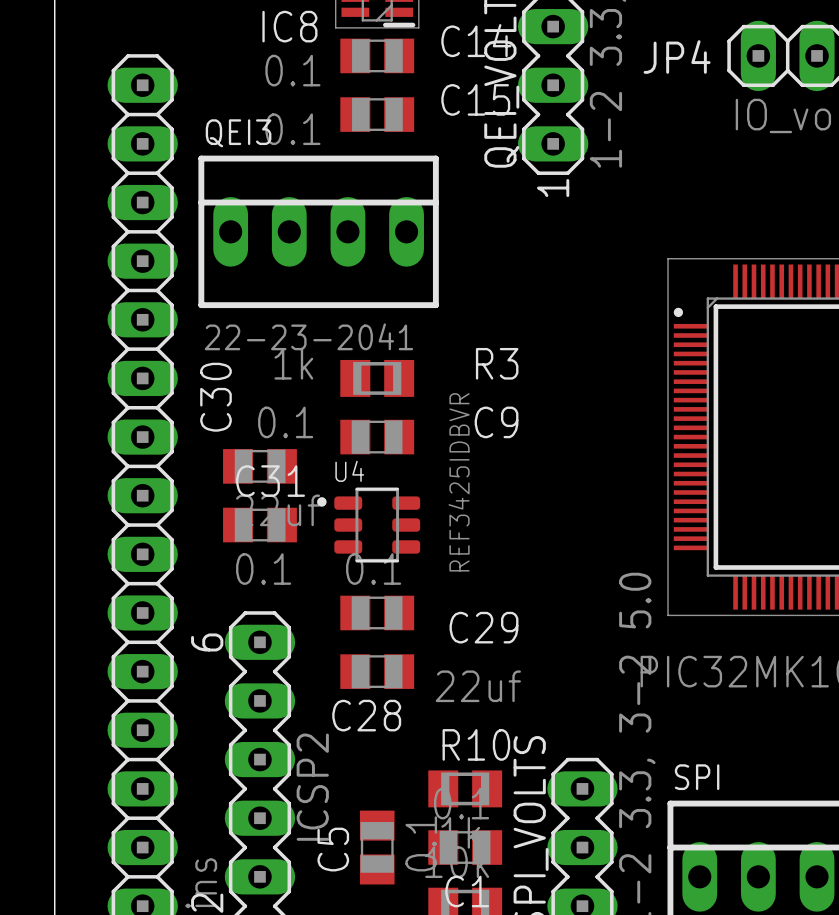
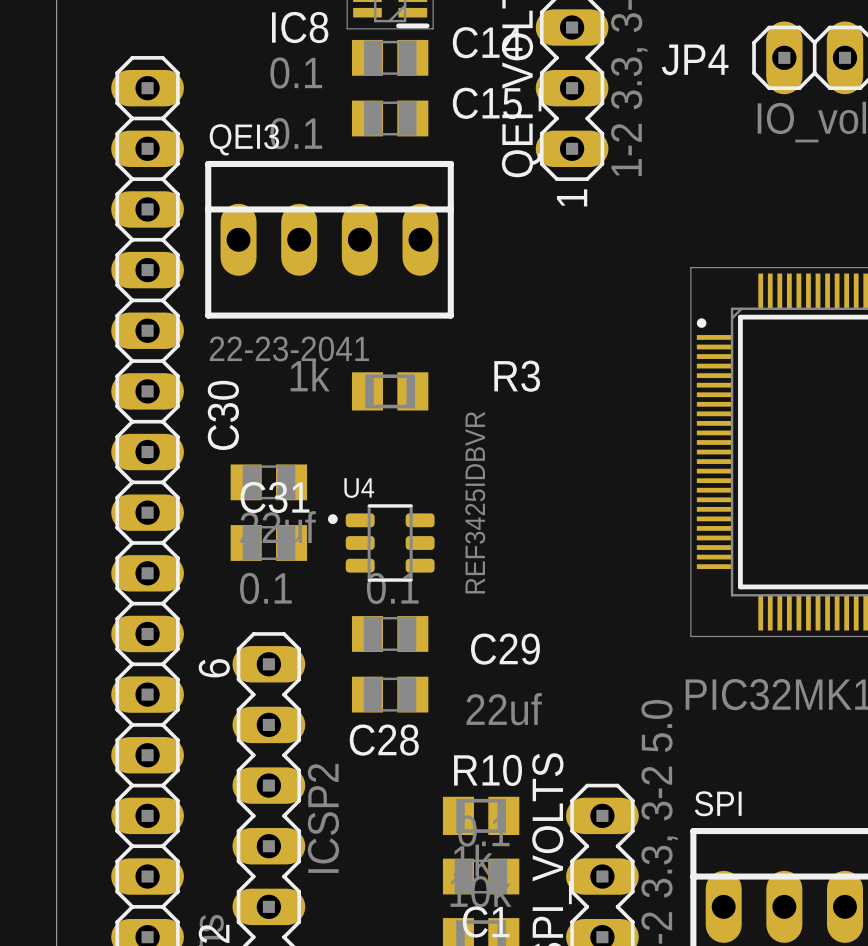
C9: 0.1 (377, 437) -> none
C5: 0.1 (377, 847) -> none

